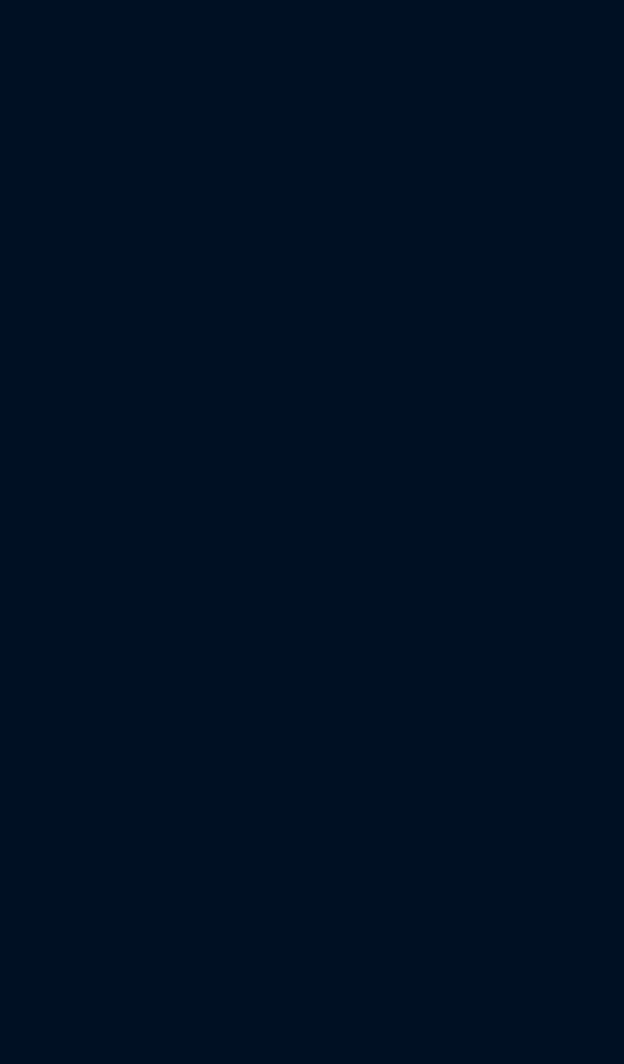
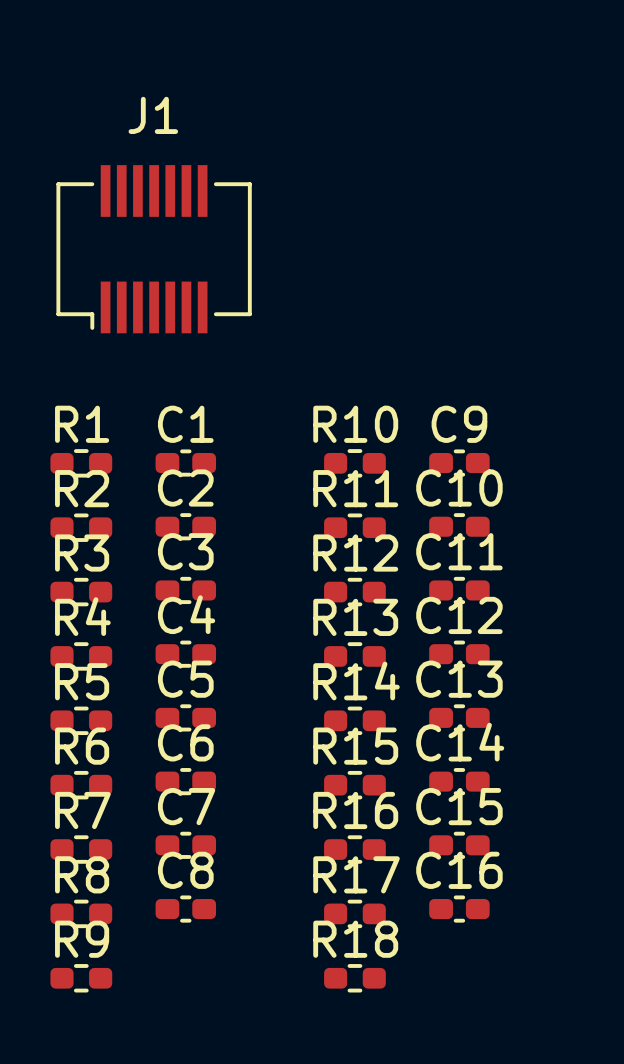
J1: none -> (154, 249)
R1: none -> (81, 463)
C1: none -> (185, 463)
R10: none -> (354, 463)
C9: none -> (459, 463)
C2: none -> (185, 526)
C10: none -> (459, 526)
R2: none -> (81, 527)
R11: none -> (354, 527)
C3: none -> (185, 590)
C11: none -> (459, 590)
R3: none -> (81, 592)
R12: none -> (354, 592)
C4: none -> (185, 654)
C12: none -> (459, 654)
R4: none -> (81, 656)
R13: none -> (354, 656)
C5: none -> (185, 717)
C13: none -> (459, 717)
R5: none -> (81, 720)
R14: none -> (354, 720)
C6: none -> (185, 781)
C14: none -> (459, 781)
R6: none -> (81, 785)
R15: none -> (354, 785)
C7: none -> (185, 845)
C15: none -> (459, 845)
R7: none -> (81, 849)
R16: none -> (354, 849)
C8: none -> (185, 909)
C16: none -> (459, 909)
R8: none -> (81, 913)
R17: none -> (354, 913)
R9: none -> (81, 978)
R18: none -> (354, 978)

